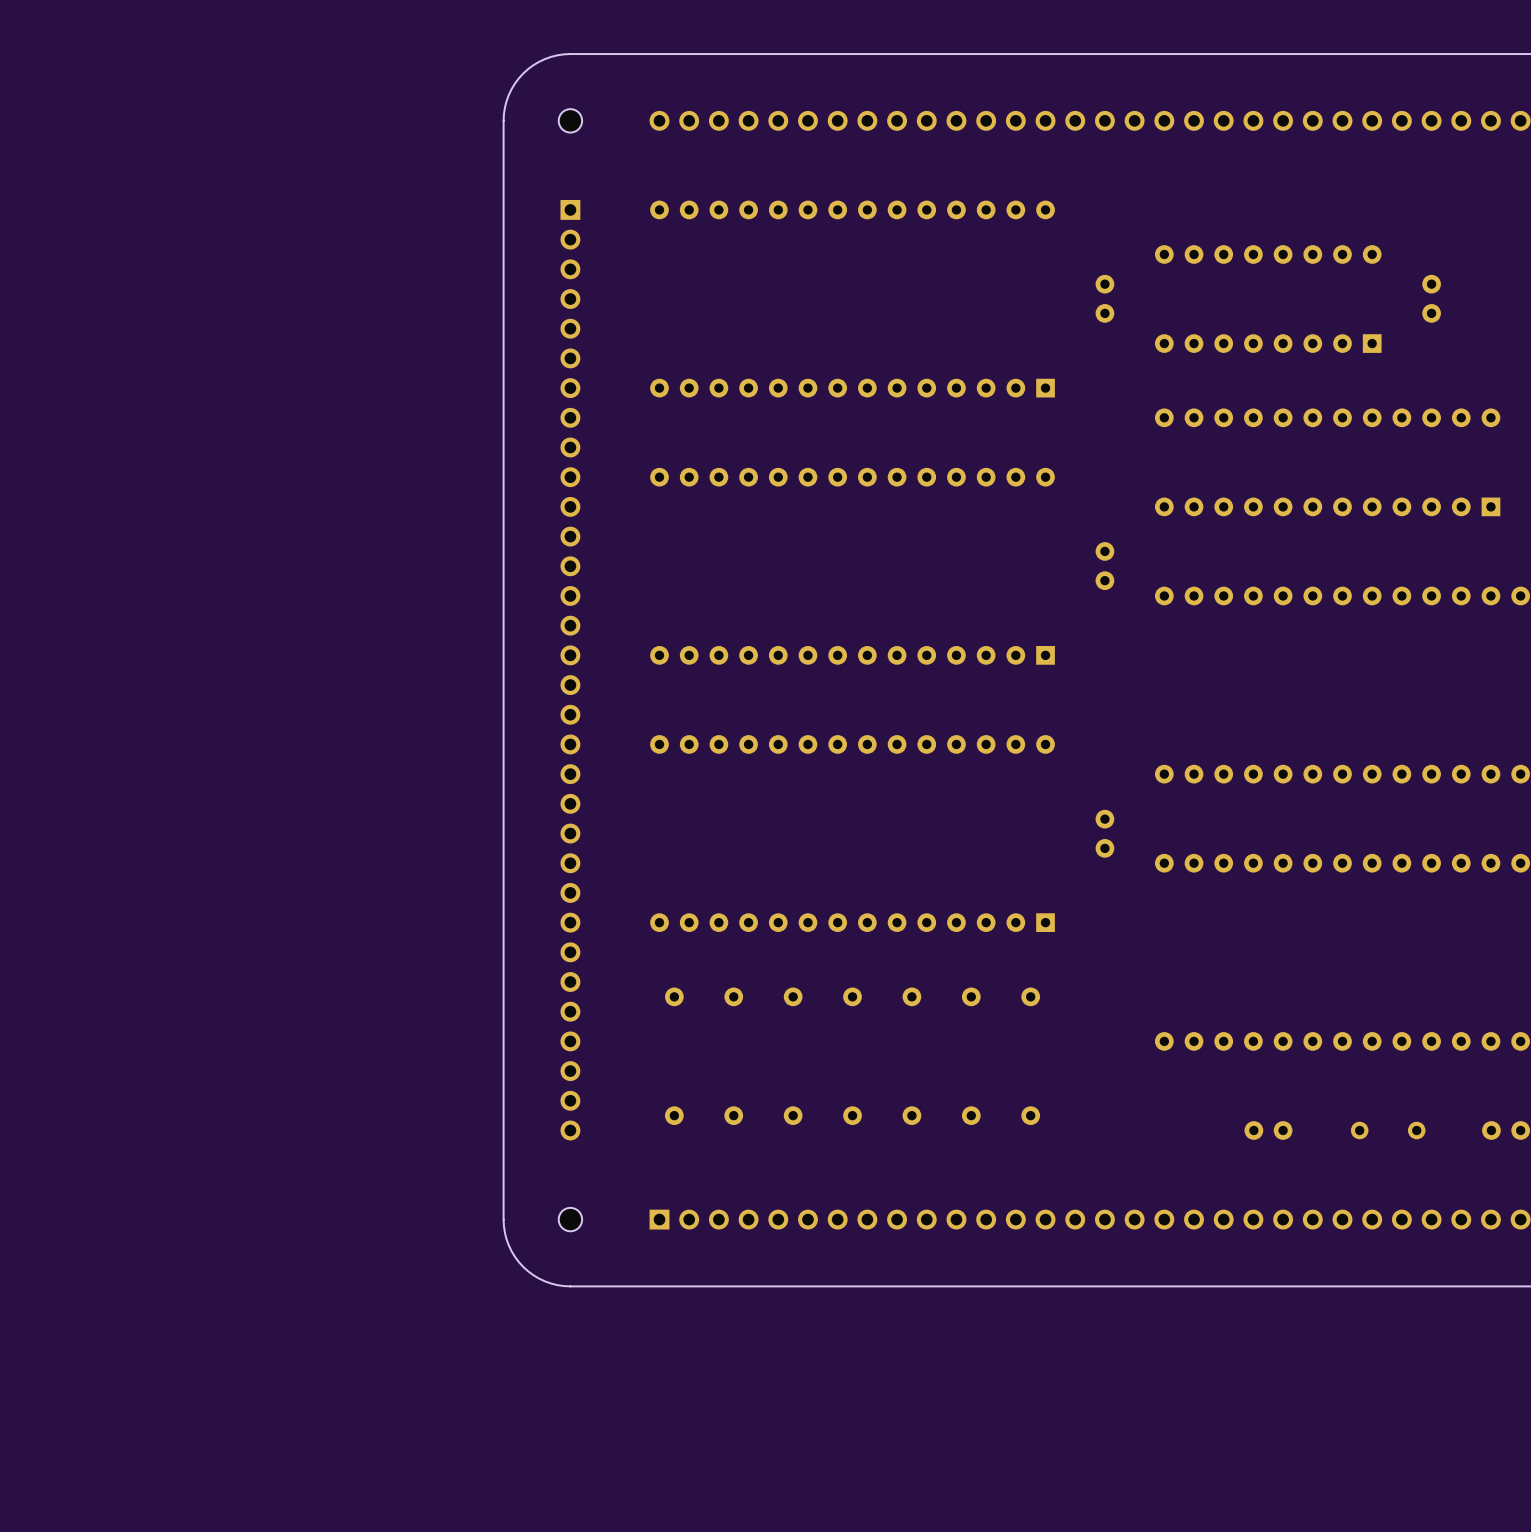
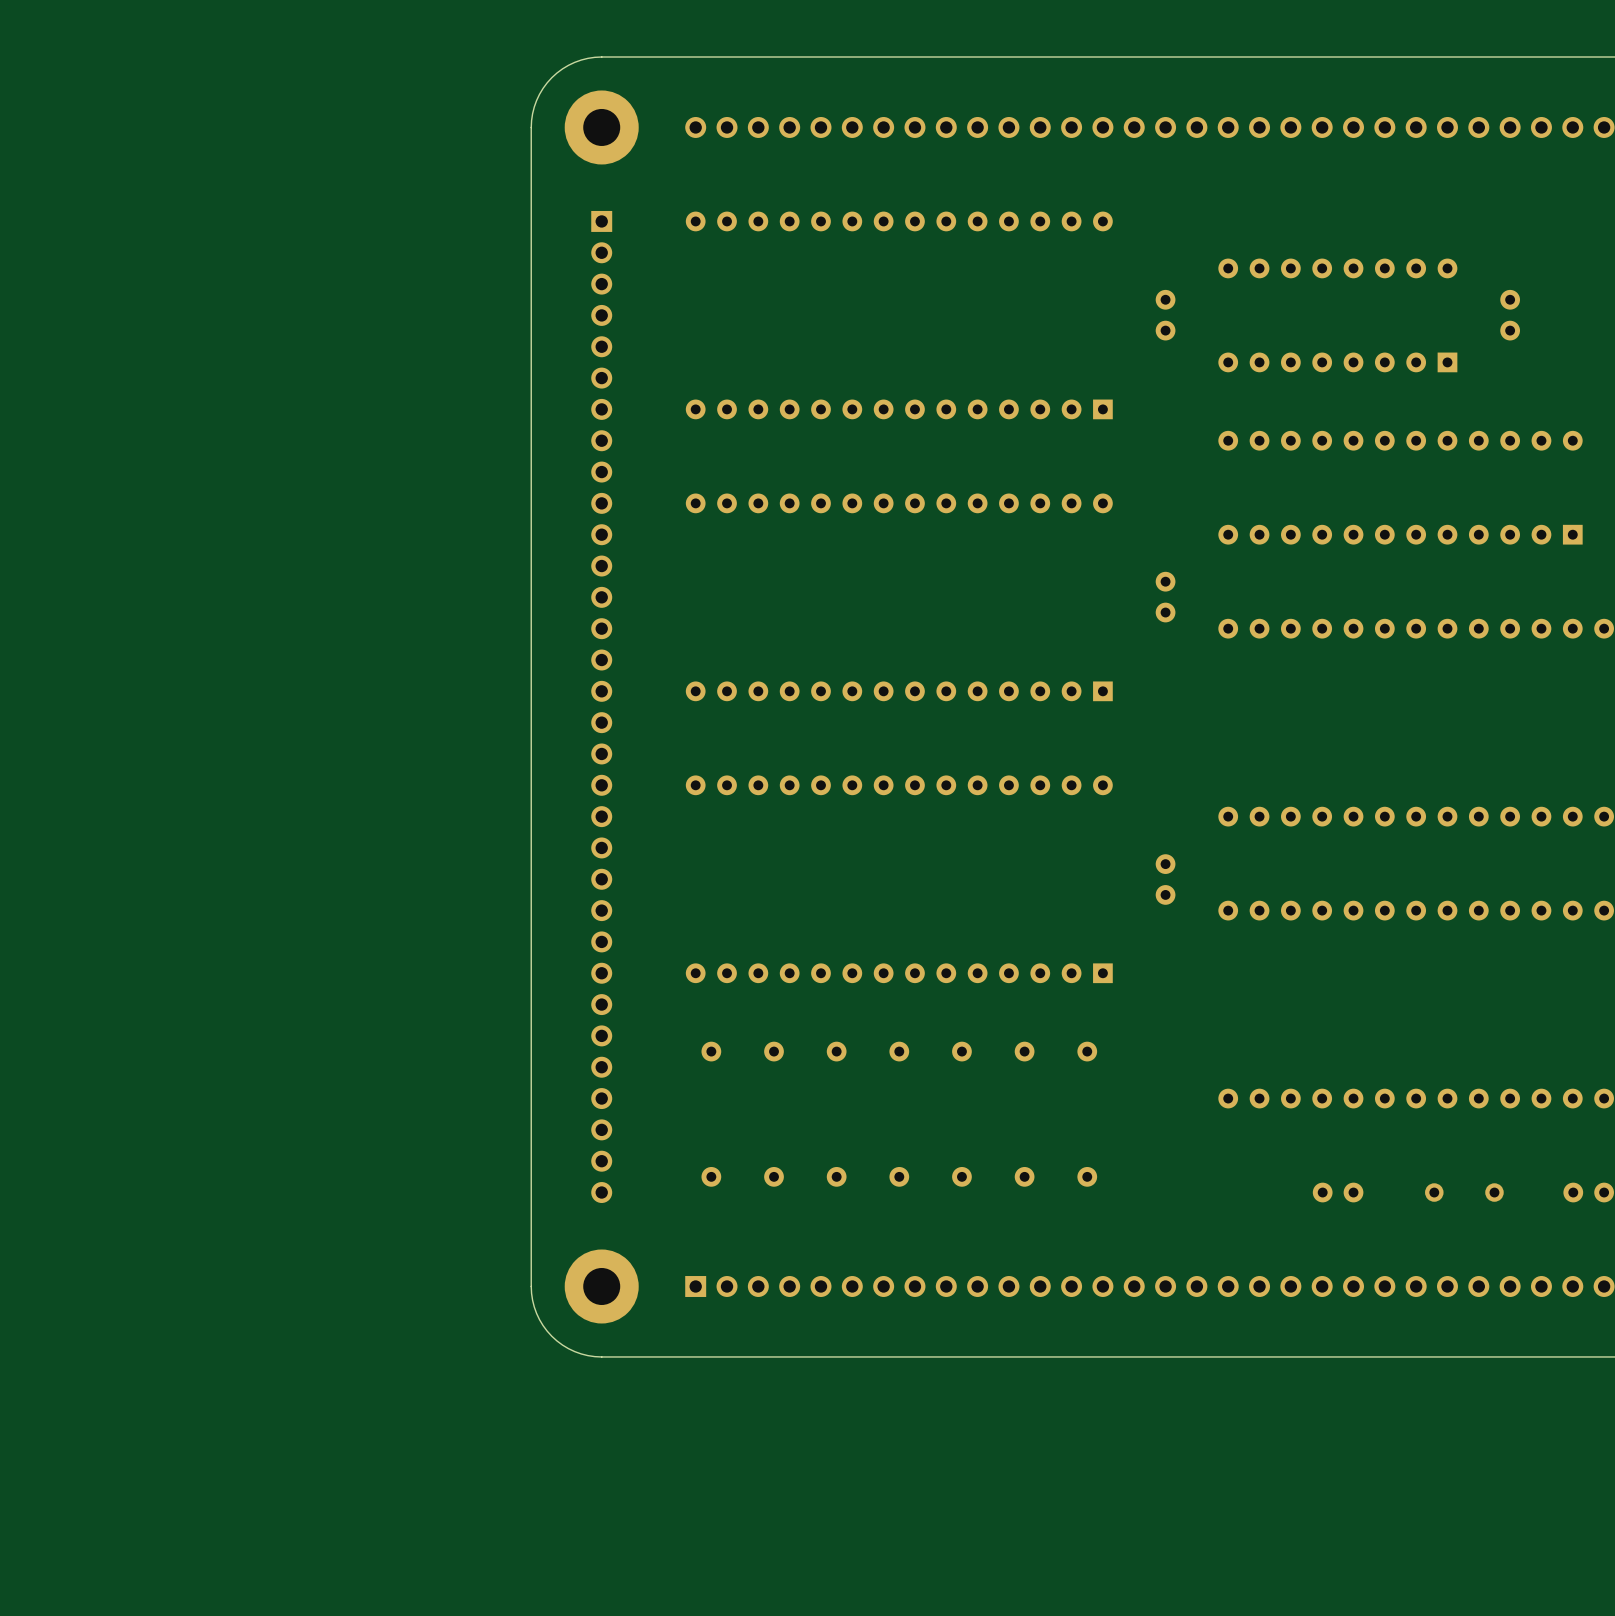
part footprint: [558, 109, 583, 133] -> [564, 90, 639, 165]
part footprint: [558, 1207, 583, 1232] -> [564, 1249, 639, 1324]

